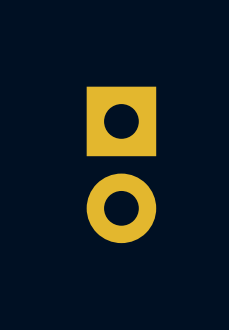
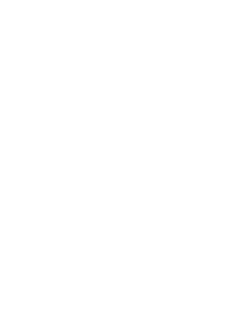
part: (121, 164) -> none

